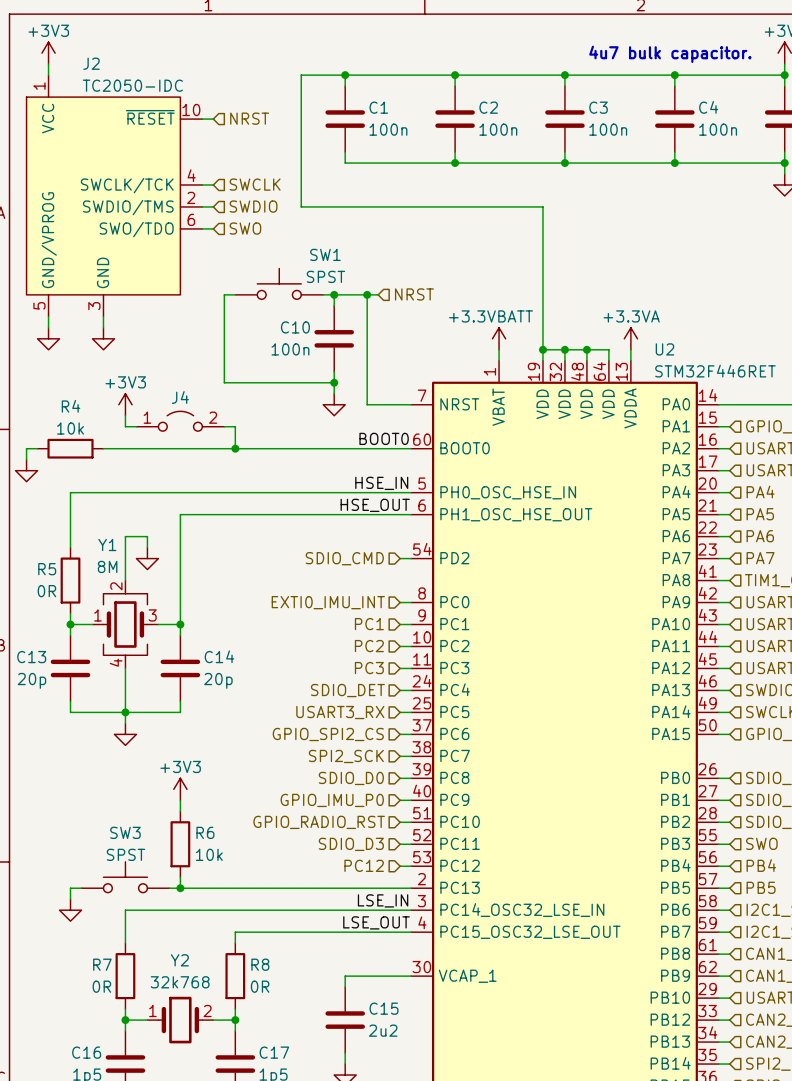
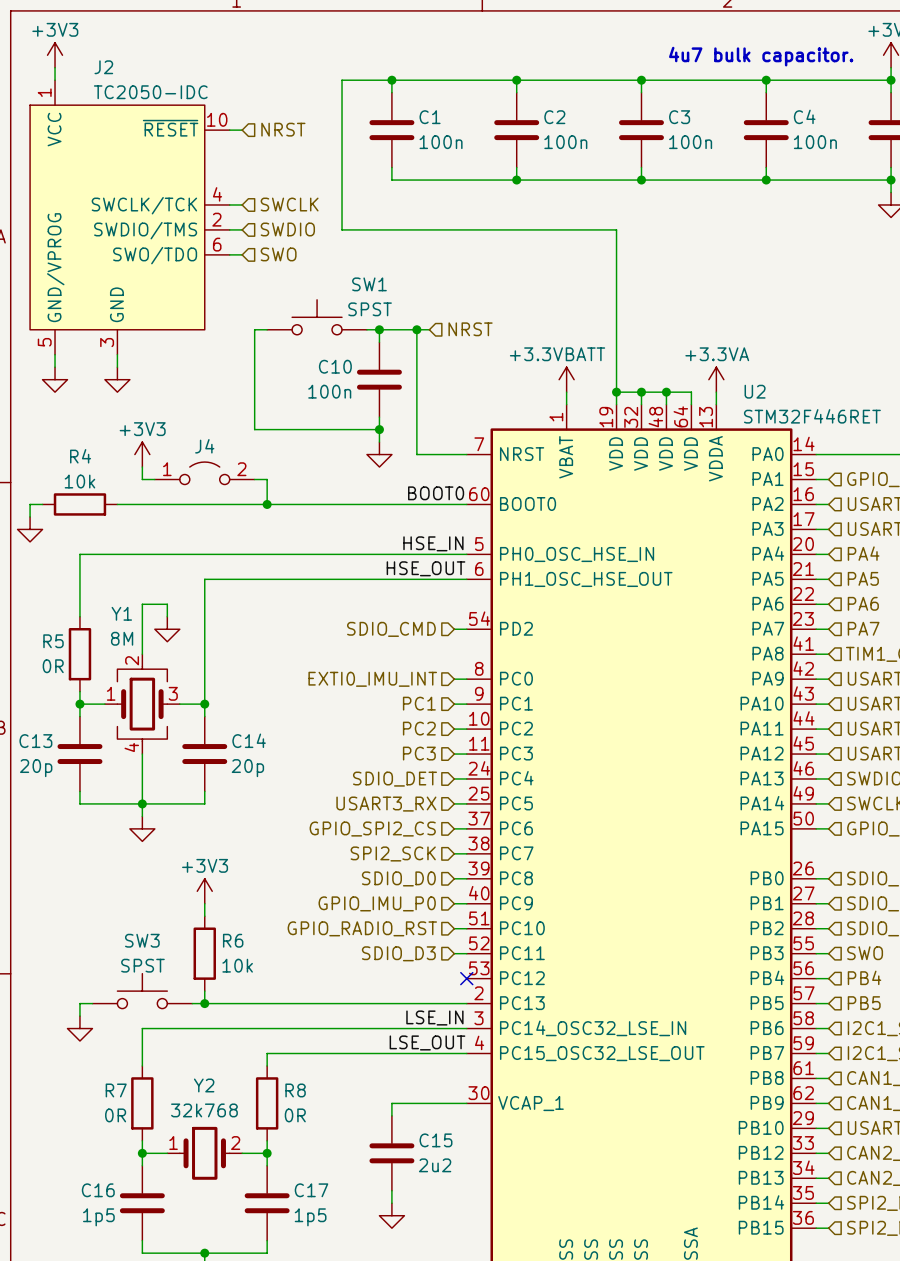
hierarchical label: PC12 (364, 865) -> none
wire: (400, 866) (411, 866) -> none
no-connect mark: none -> (466, 978)

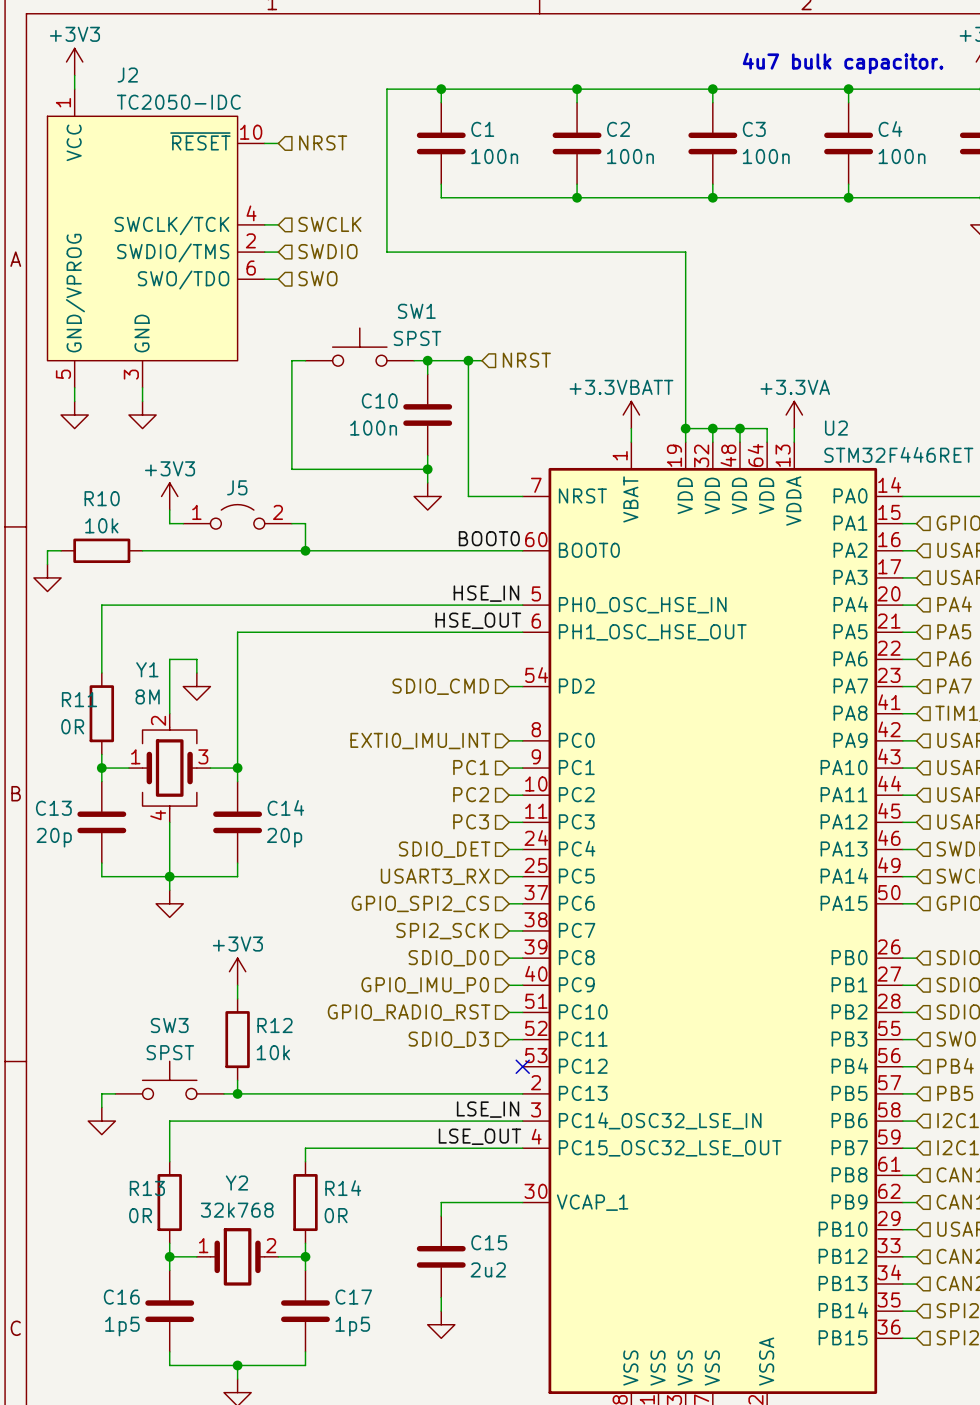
J4 name: J4 (204, 446) -> J5 (237, 487)
R4 name: R4 (80, 456) -> R10 (102, 498)
R5 name: R5 (53, 641) -> R11 (79, 699)
R6 name: R6 (233, 940) -> R12 (275, 1025)
R7 name: R7 (116, 1090) -> R13 (147, 1188)
R8 name: R8 (295, 1090) -> R14 (343, 1188)

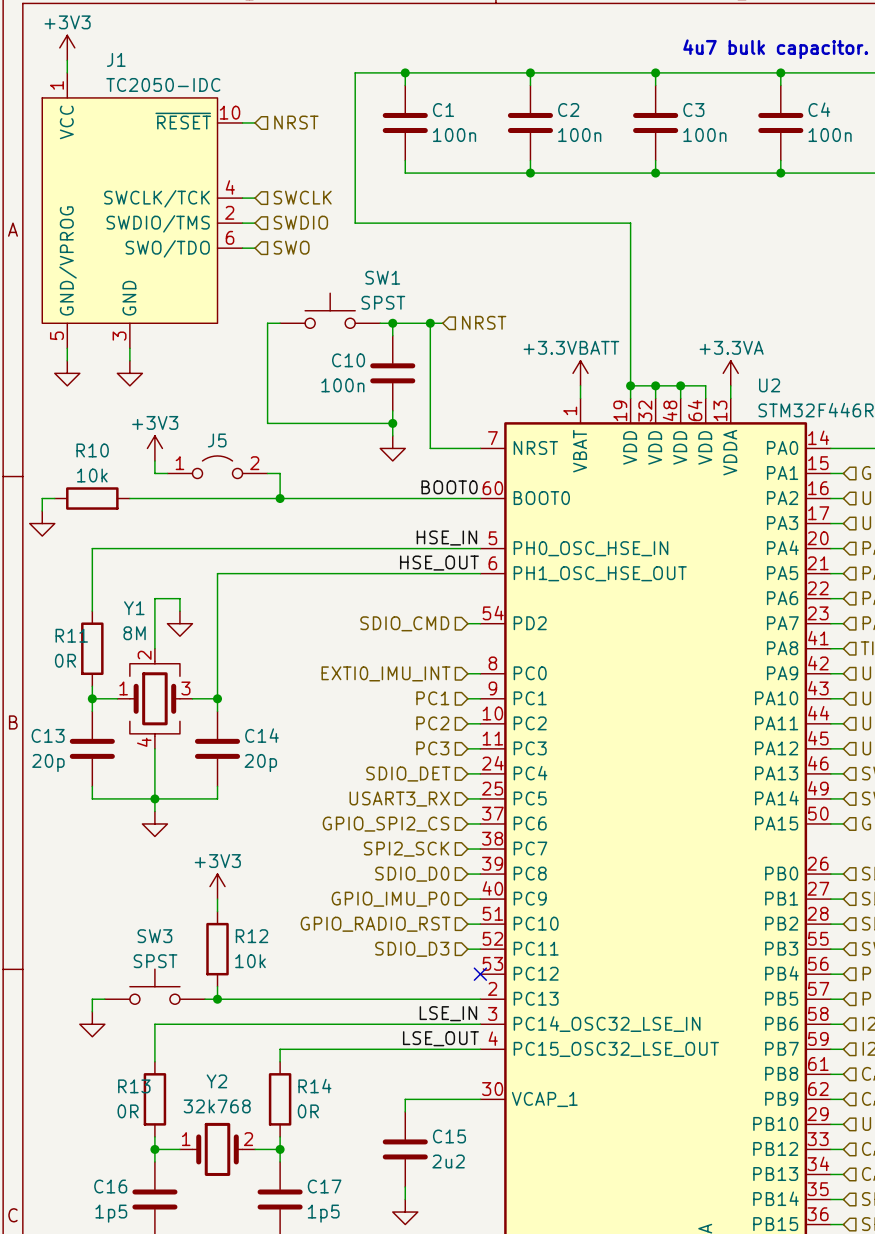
J2 name: J2 (127, 75) -> J1 (116, 59)

